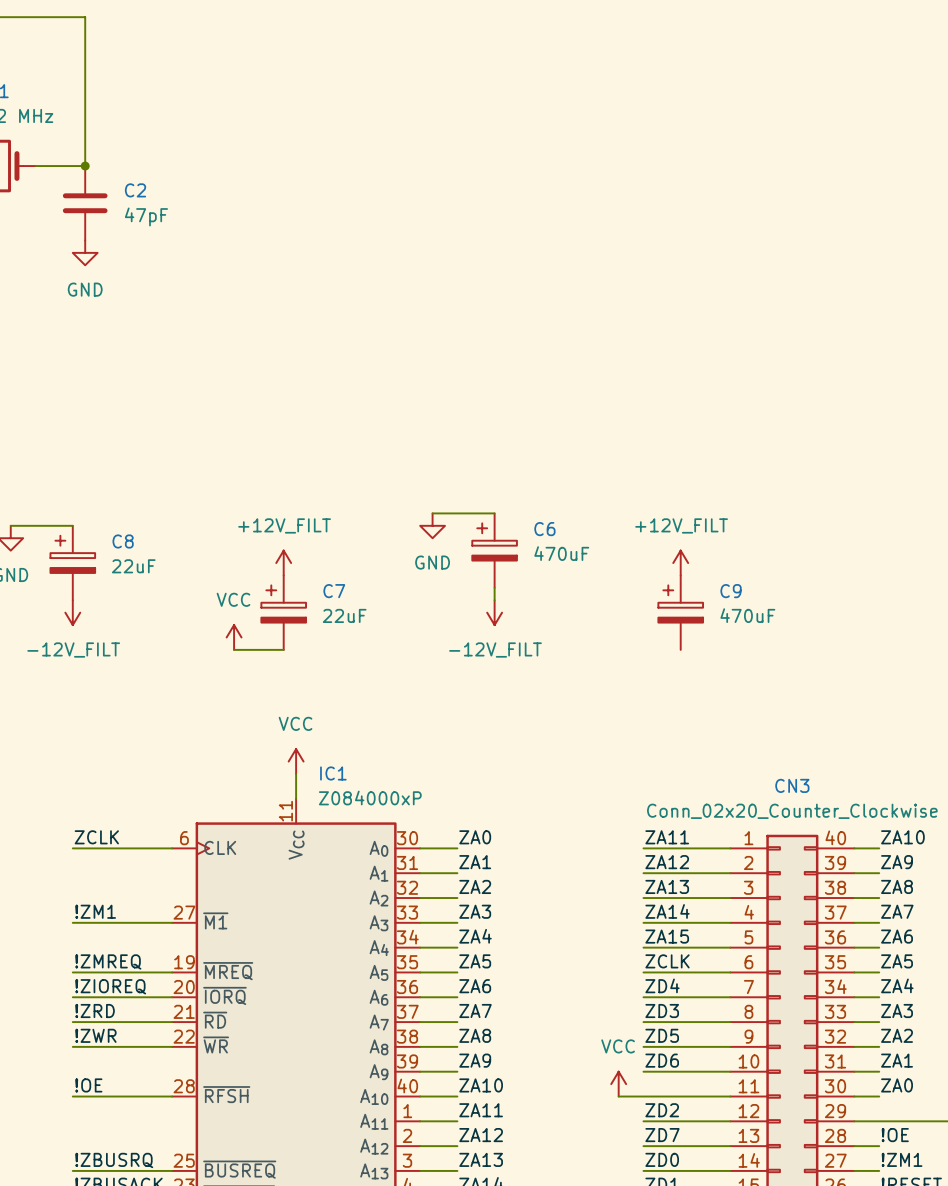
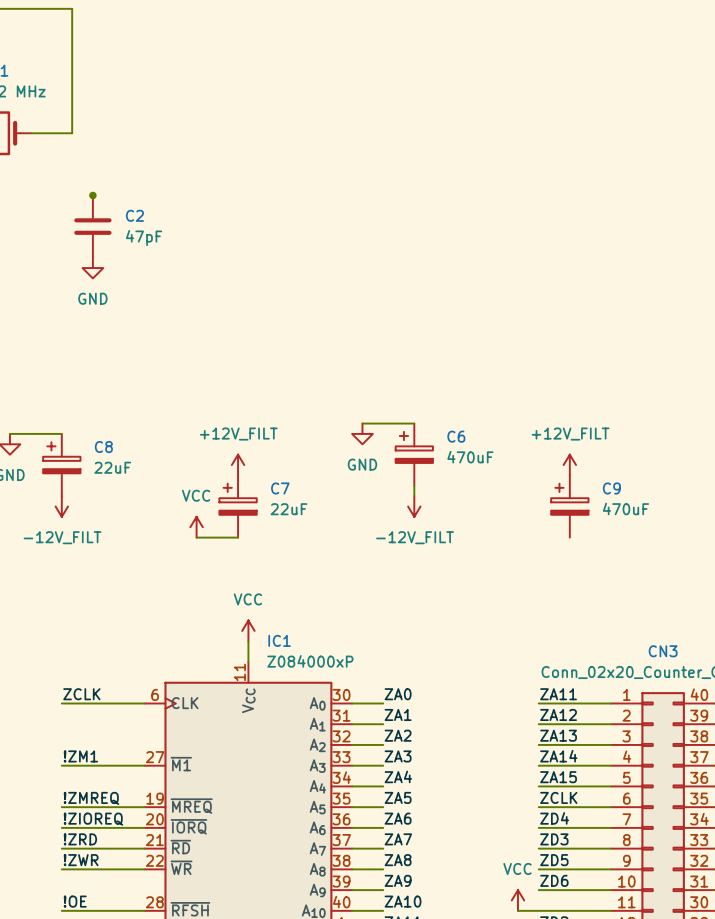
junction: (85, 166) -> none
C2 position: (85, 203) -> (92, 226)
junction: none -> (92, 195)
power symbol position: GND (85, 252) -> GND (92, 268)

